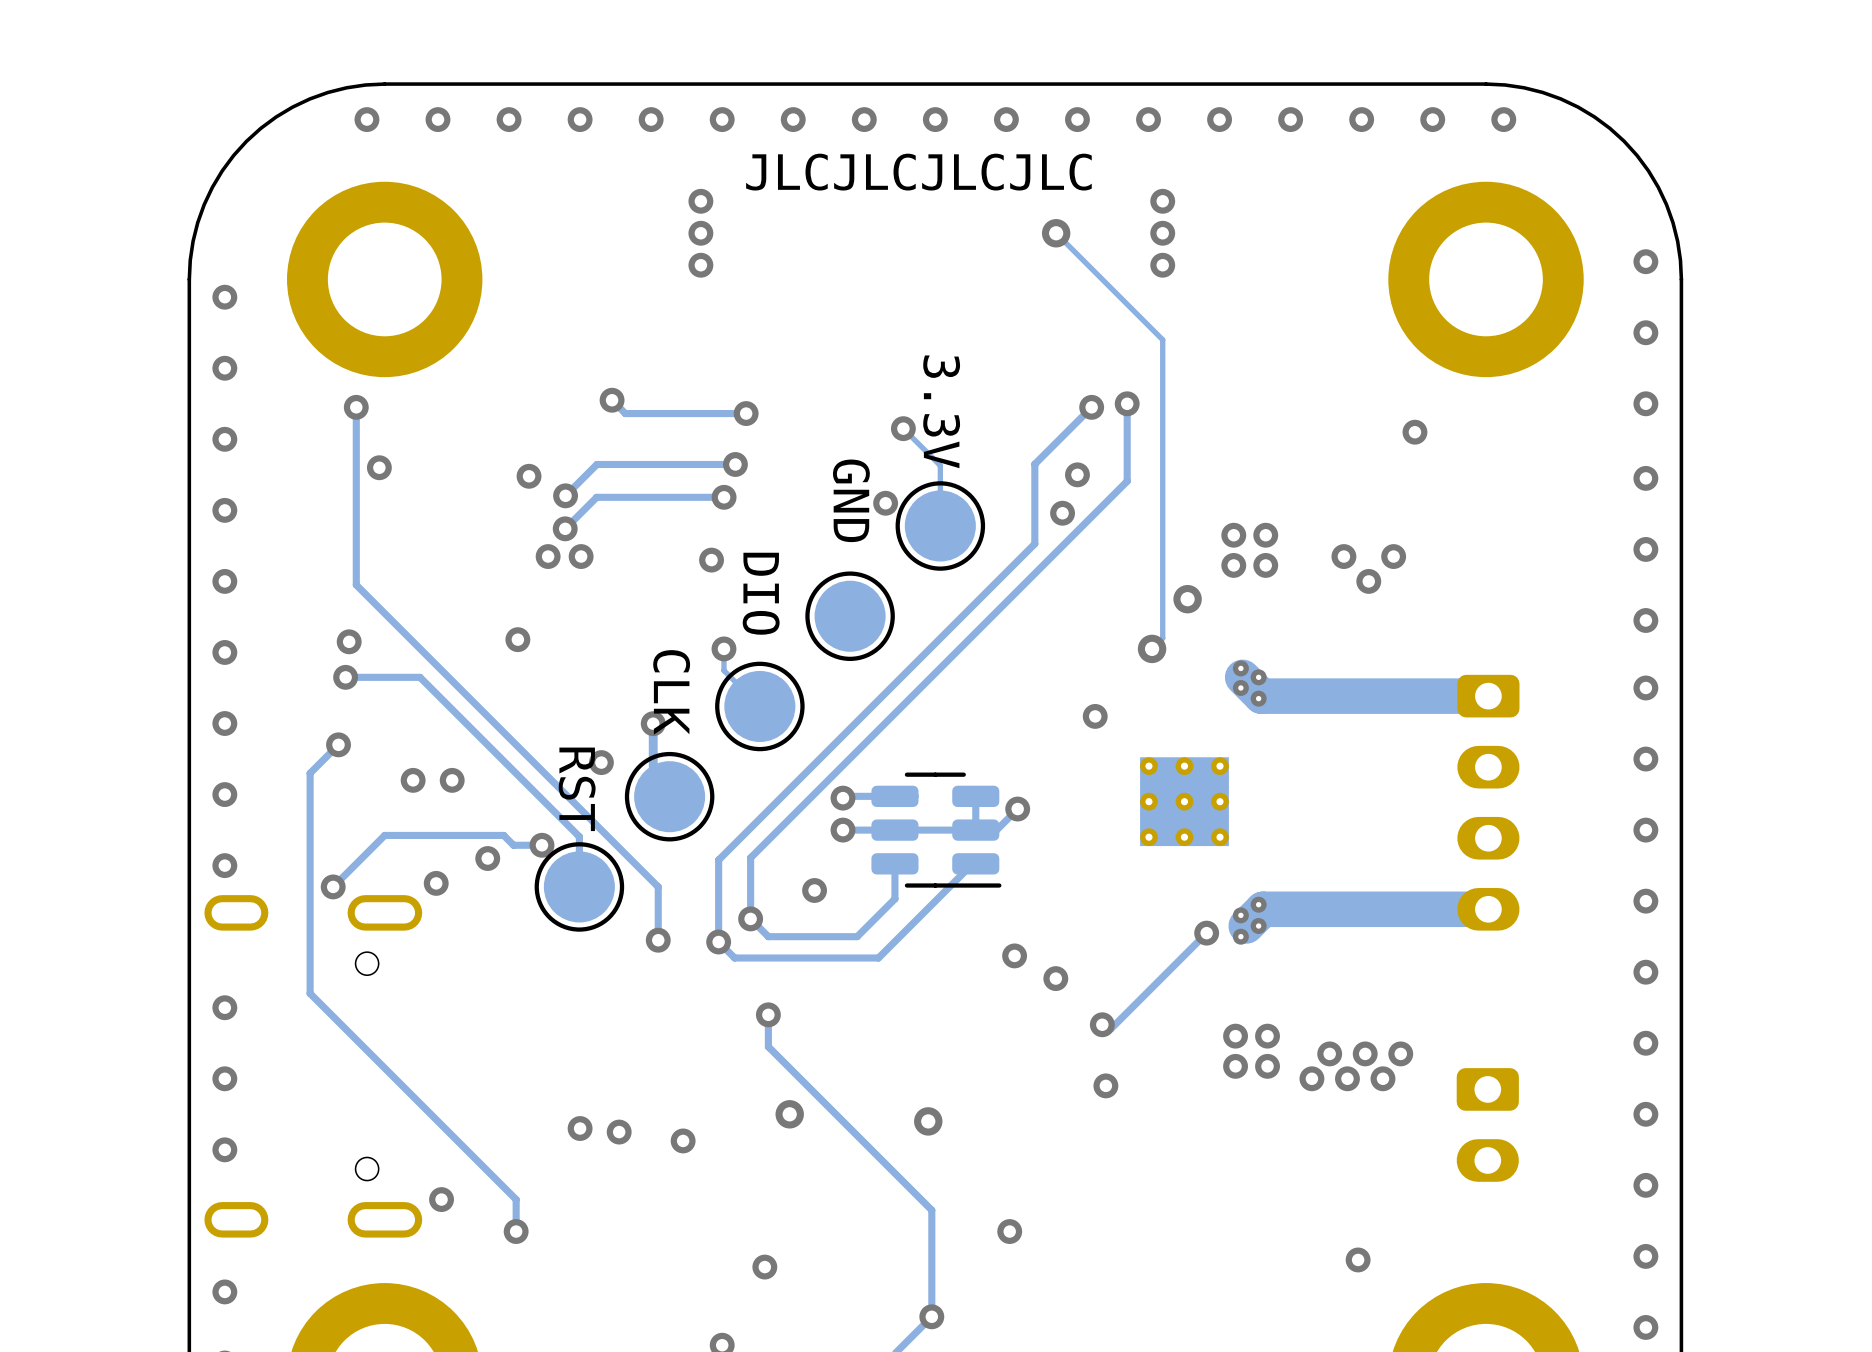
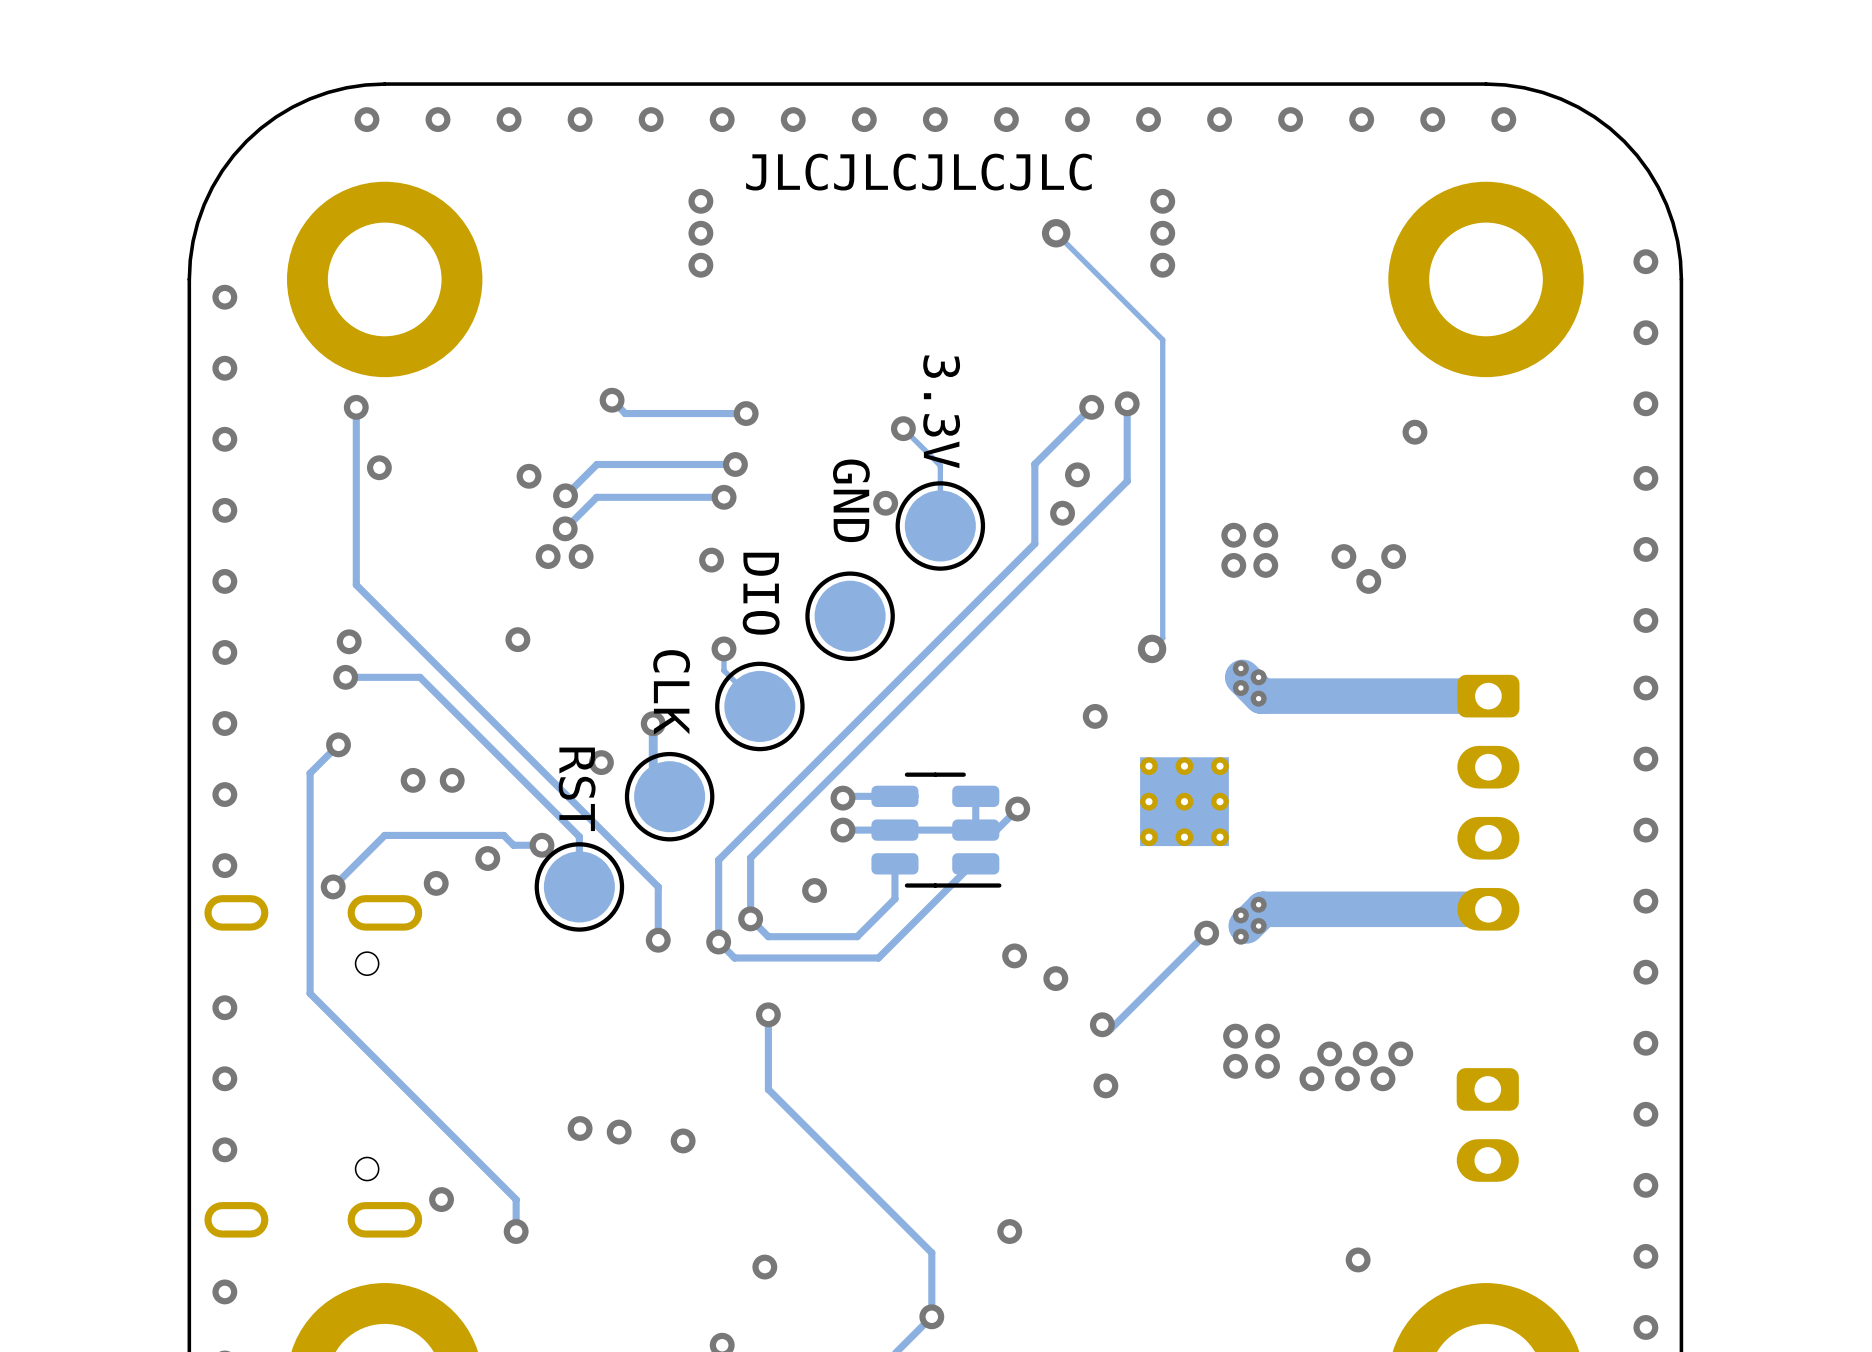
via: (1187, 599) -> none
track: (768, 1046) (931, 1210) (931, 1252) -> (768, 1046) (768, 1089) (931, 1252)
via: (789, 1114) -> none
via: (928, 1121) -> none

